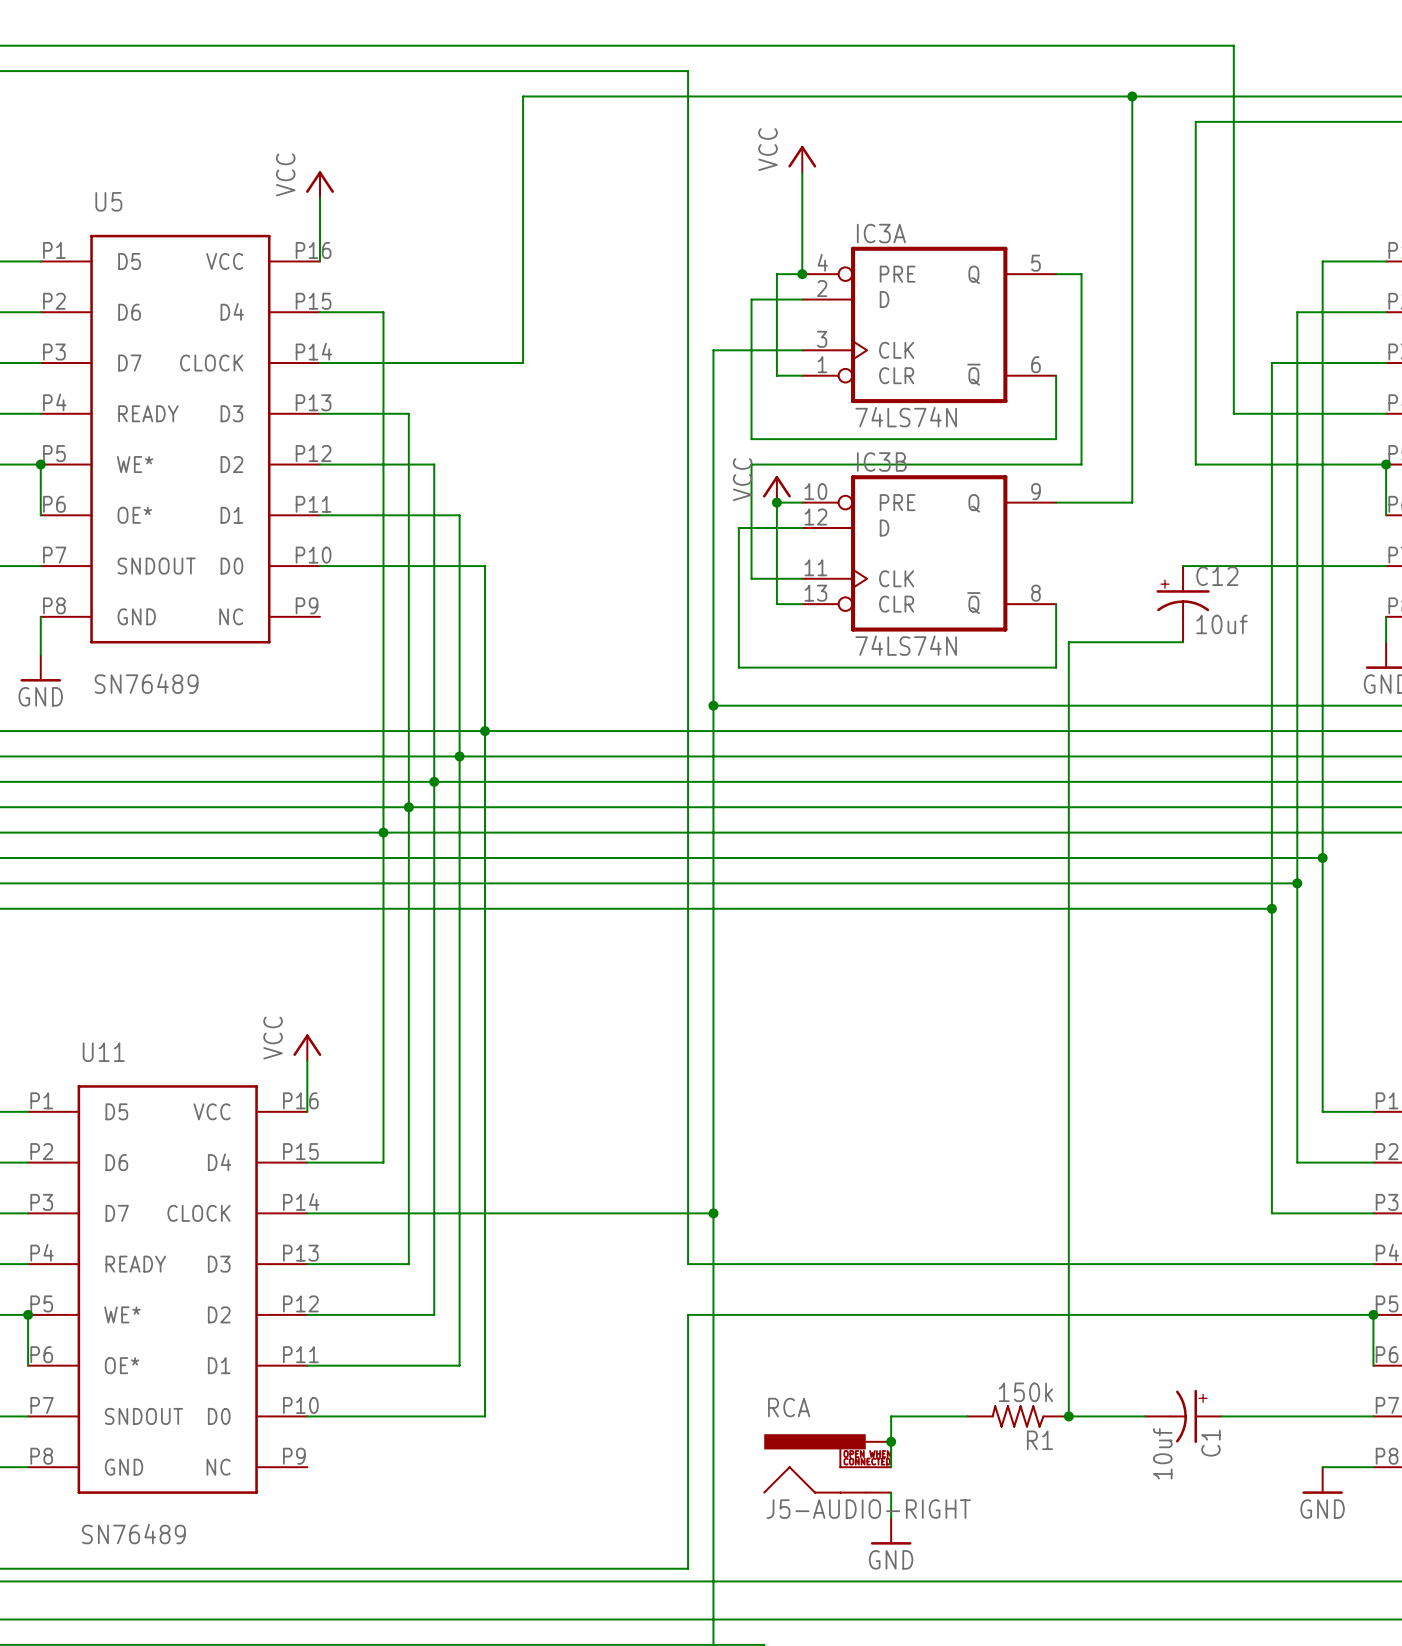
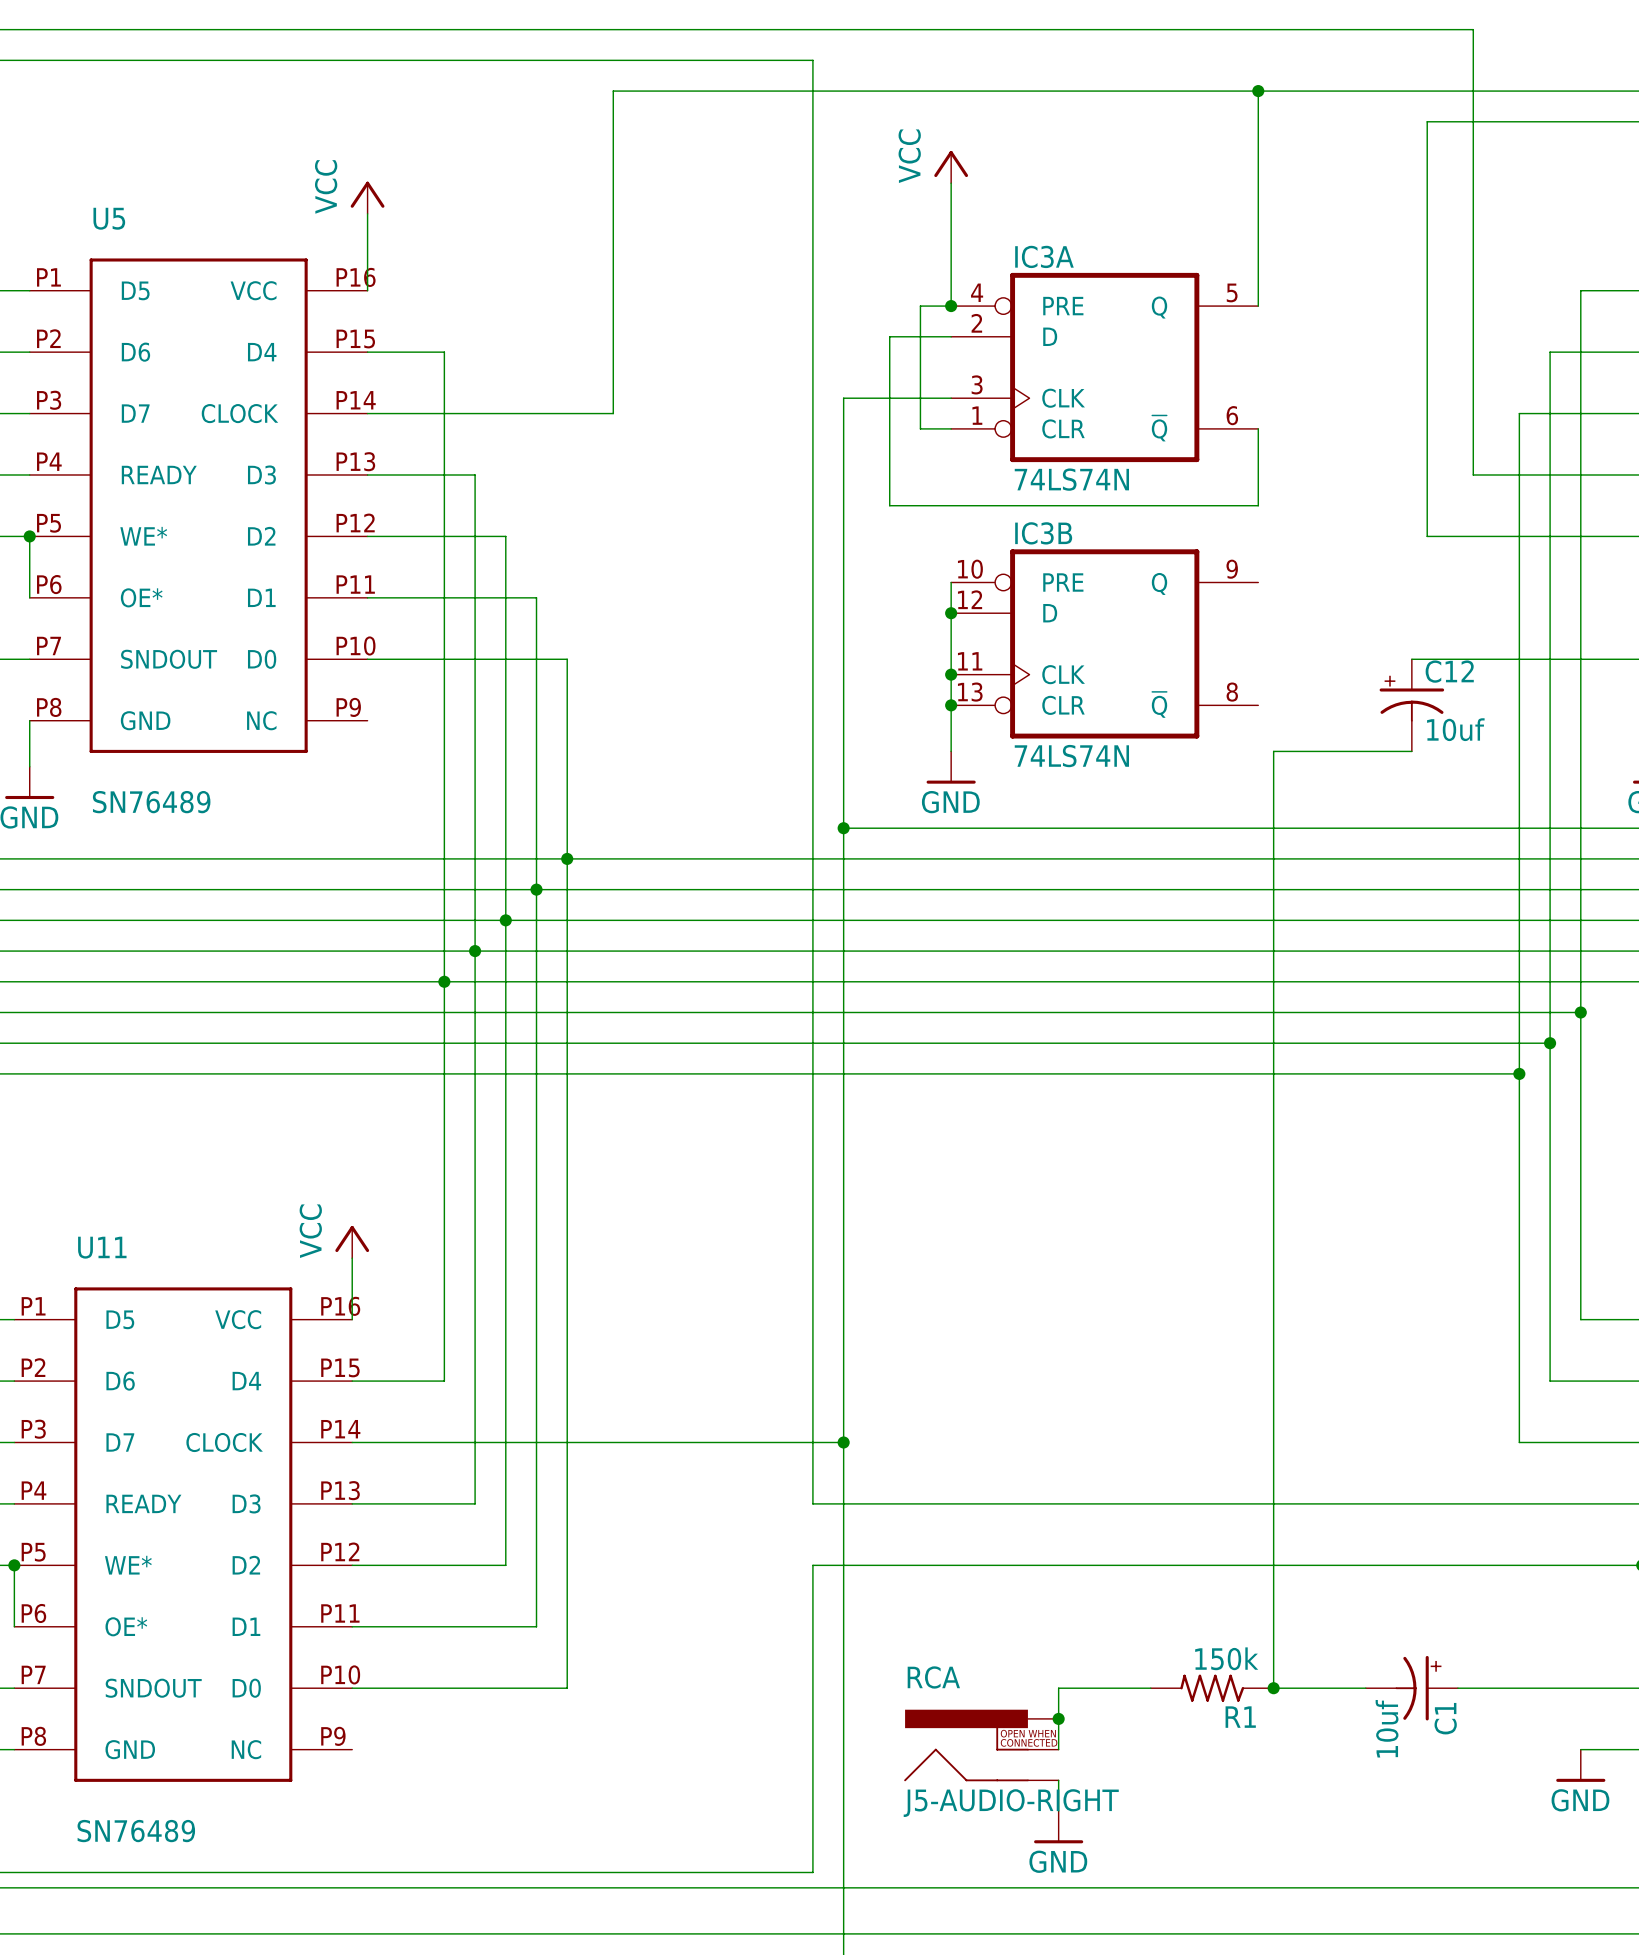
junction: none -> (1258, 91)
wire: (1132, 96) (1132, 502) (1056, 502) -> none
junction: (1132, 96) -> none
wire: (1056, 274) (1081, 274) (1081, 464) (751, 464) (751, 578) (802, 578) -> (1258, 306) (1258, 91)
power symbol: VCC (776, 489) -> none
junction position: (776, 502) -> (951, 613)
wire: (802, 502) (776, 502) (776, 604) (802, 604) -> (951, 582) (951, 751)
wire: (802, 528) (738, 528) (738, 667) (1056, 667) (1056, 604) -> none
junction: none -> (951, 674)
junction: none -> (951, 705)
power symbol: none -> GND (951, 767)

